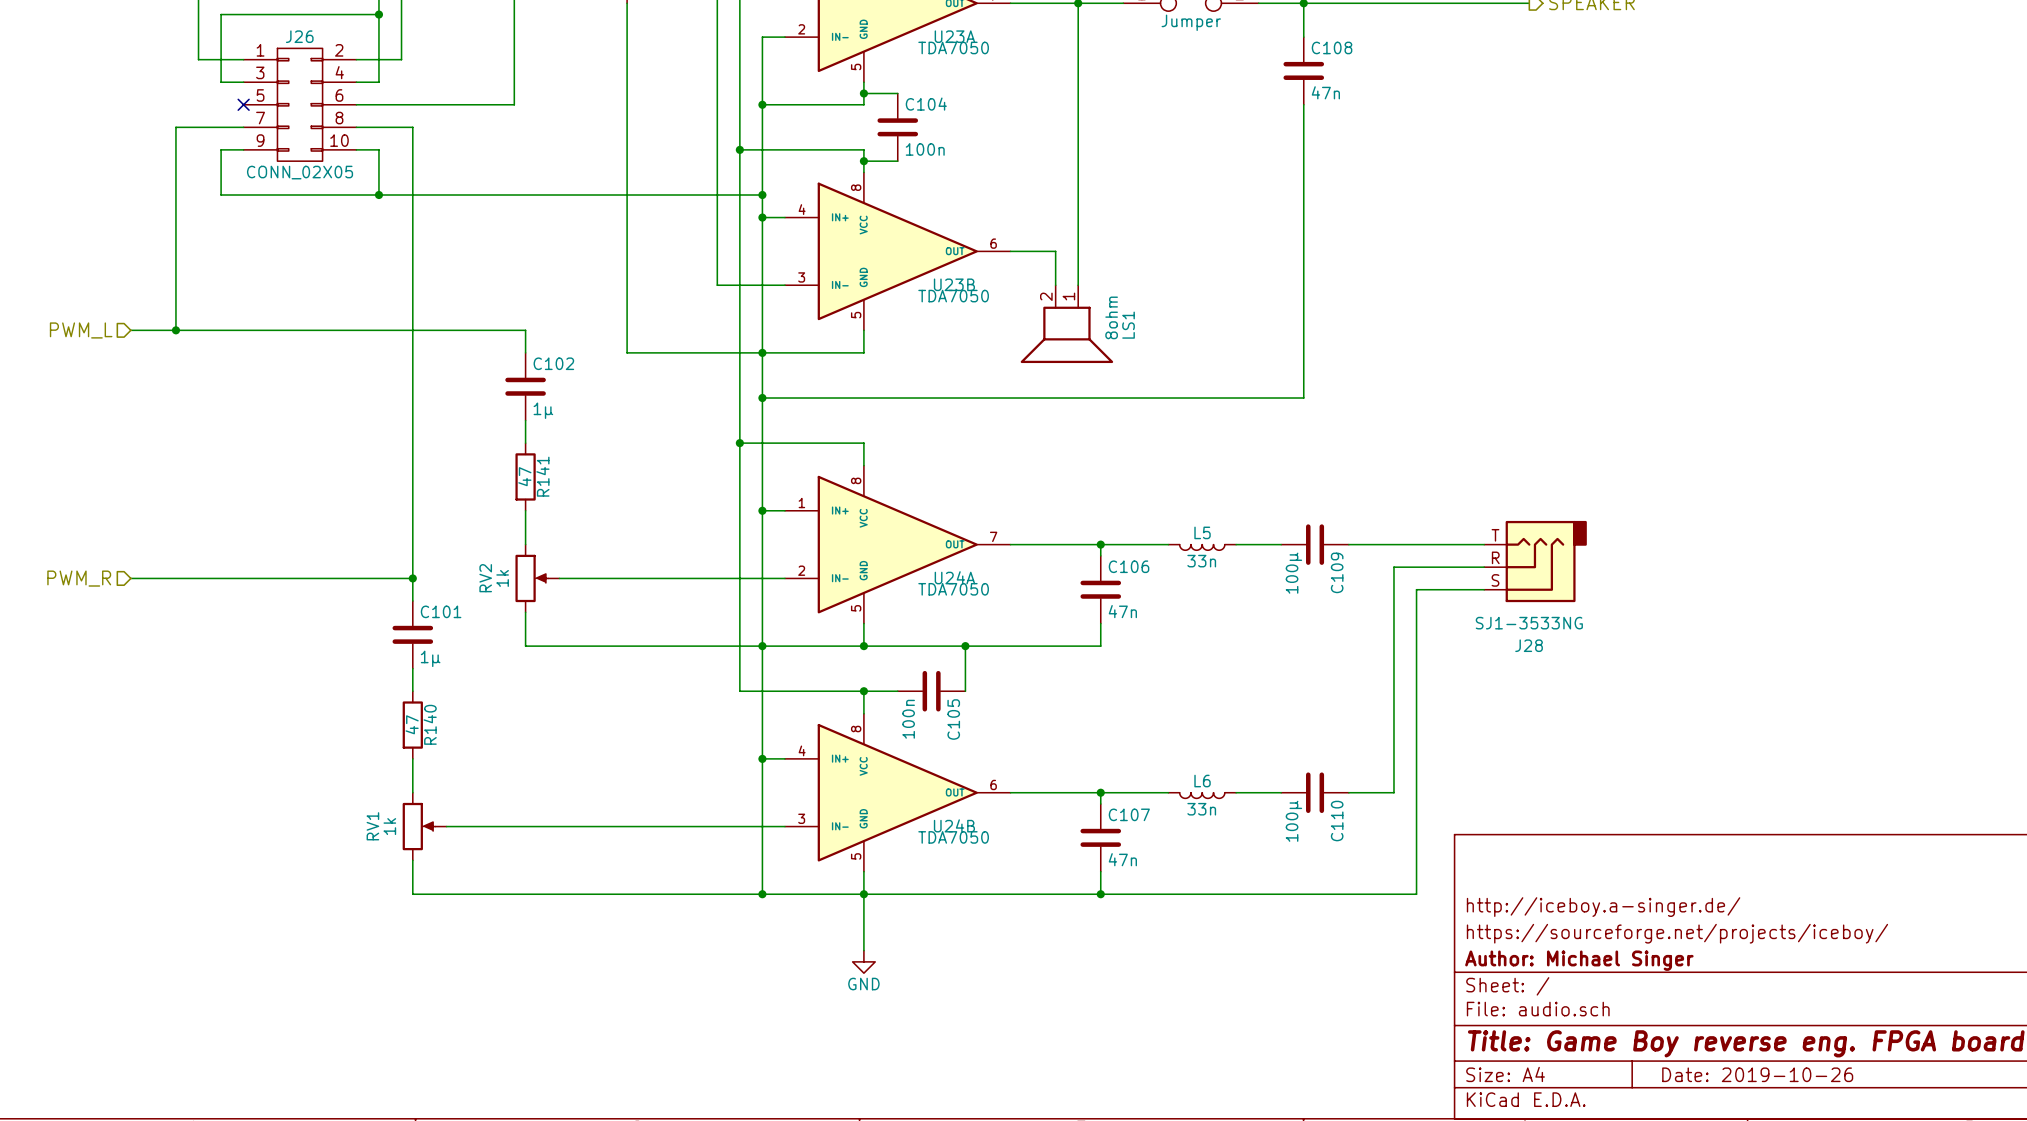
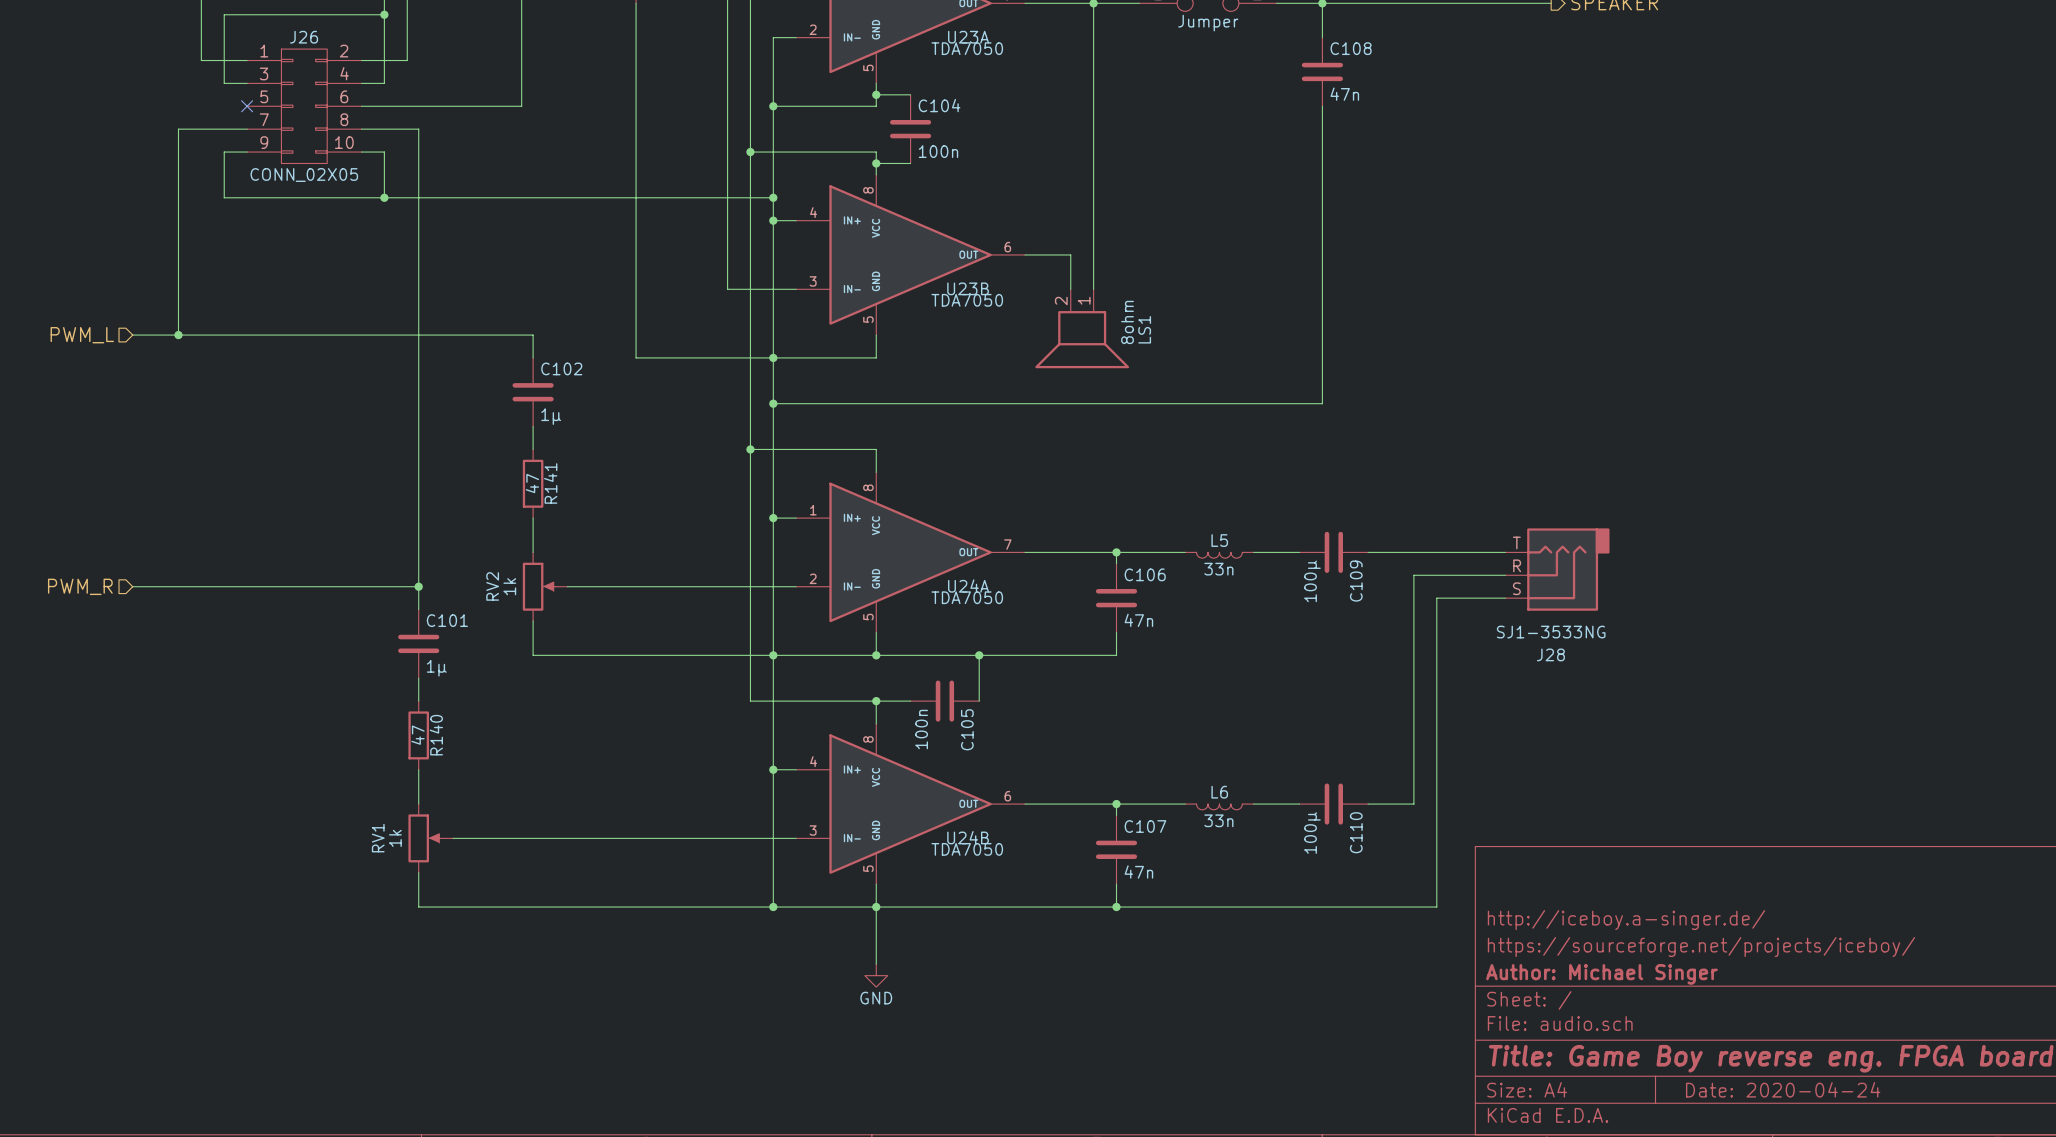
title block: Date: 2019-10-26 (1757, 1074) -> Date: 2020-04-24 (1783, 1089)

